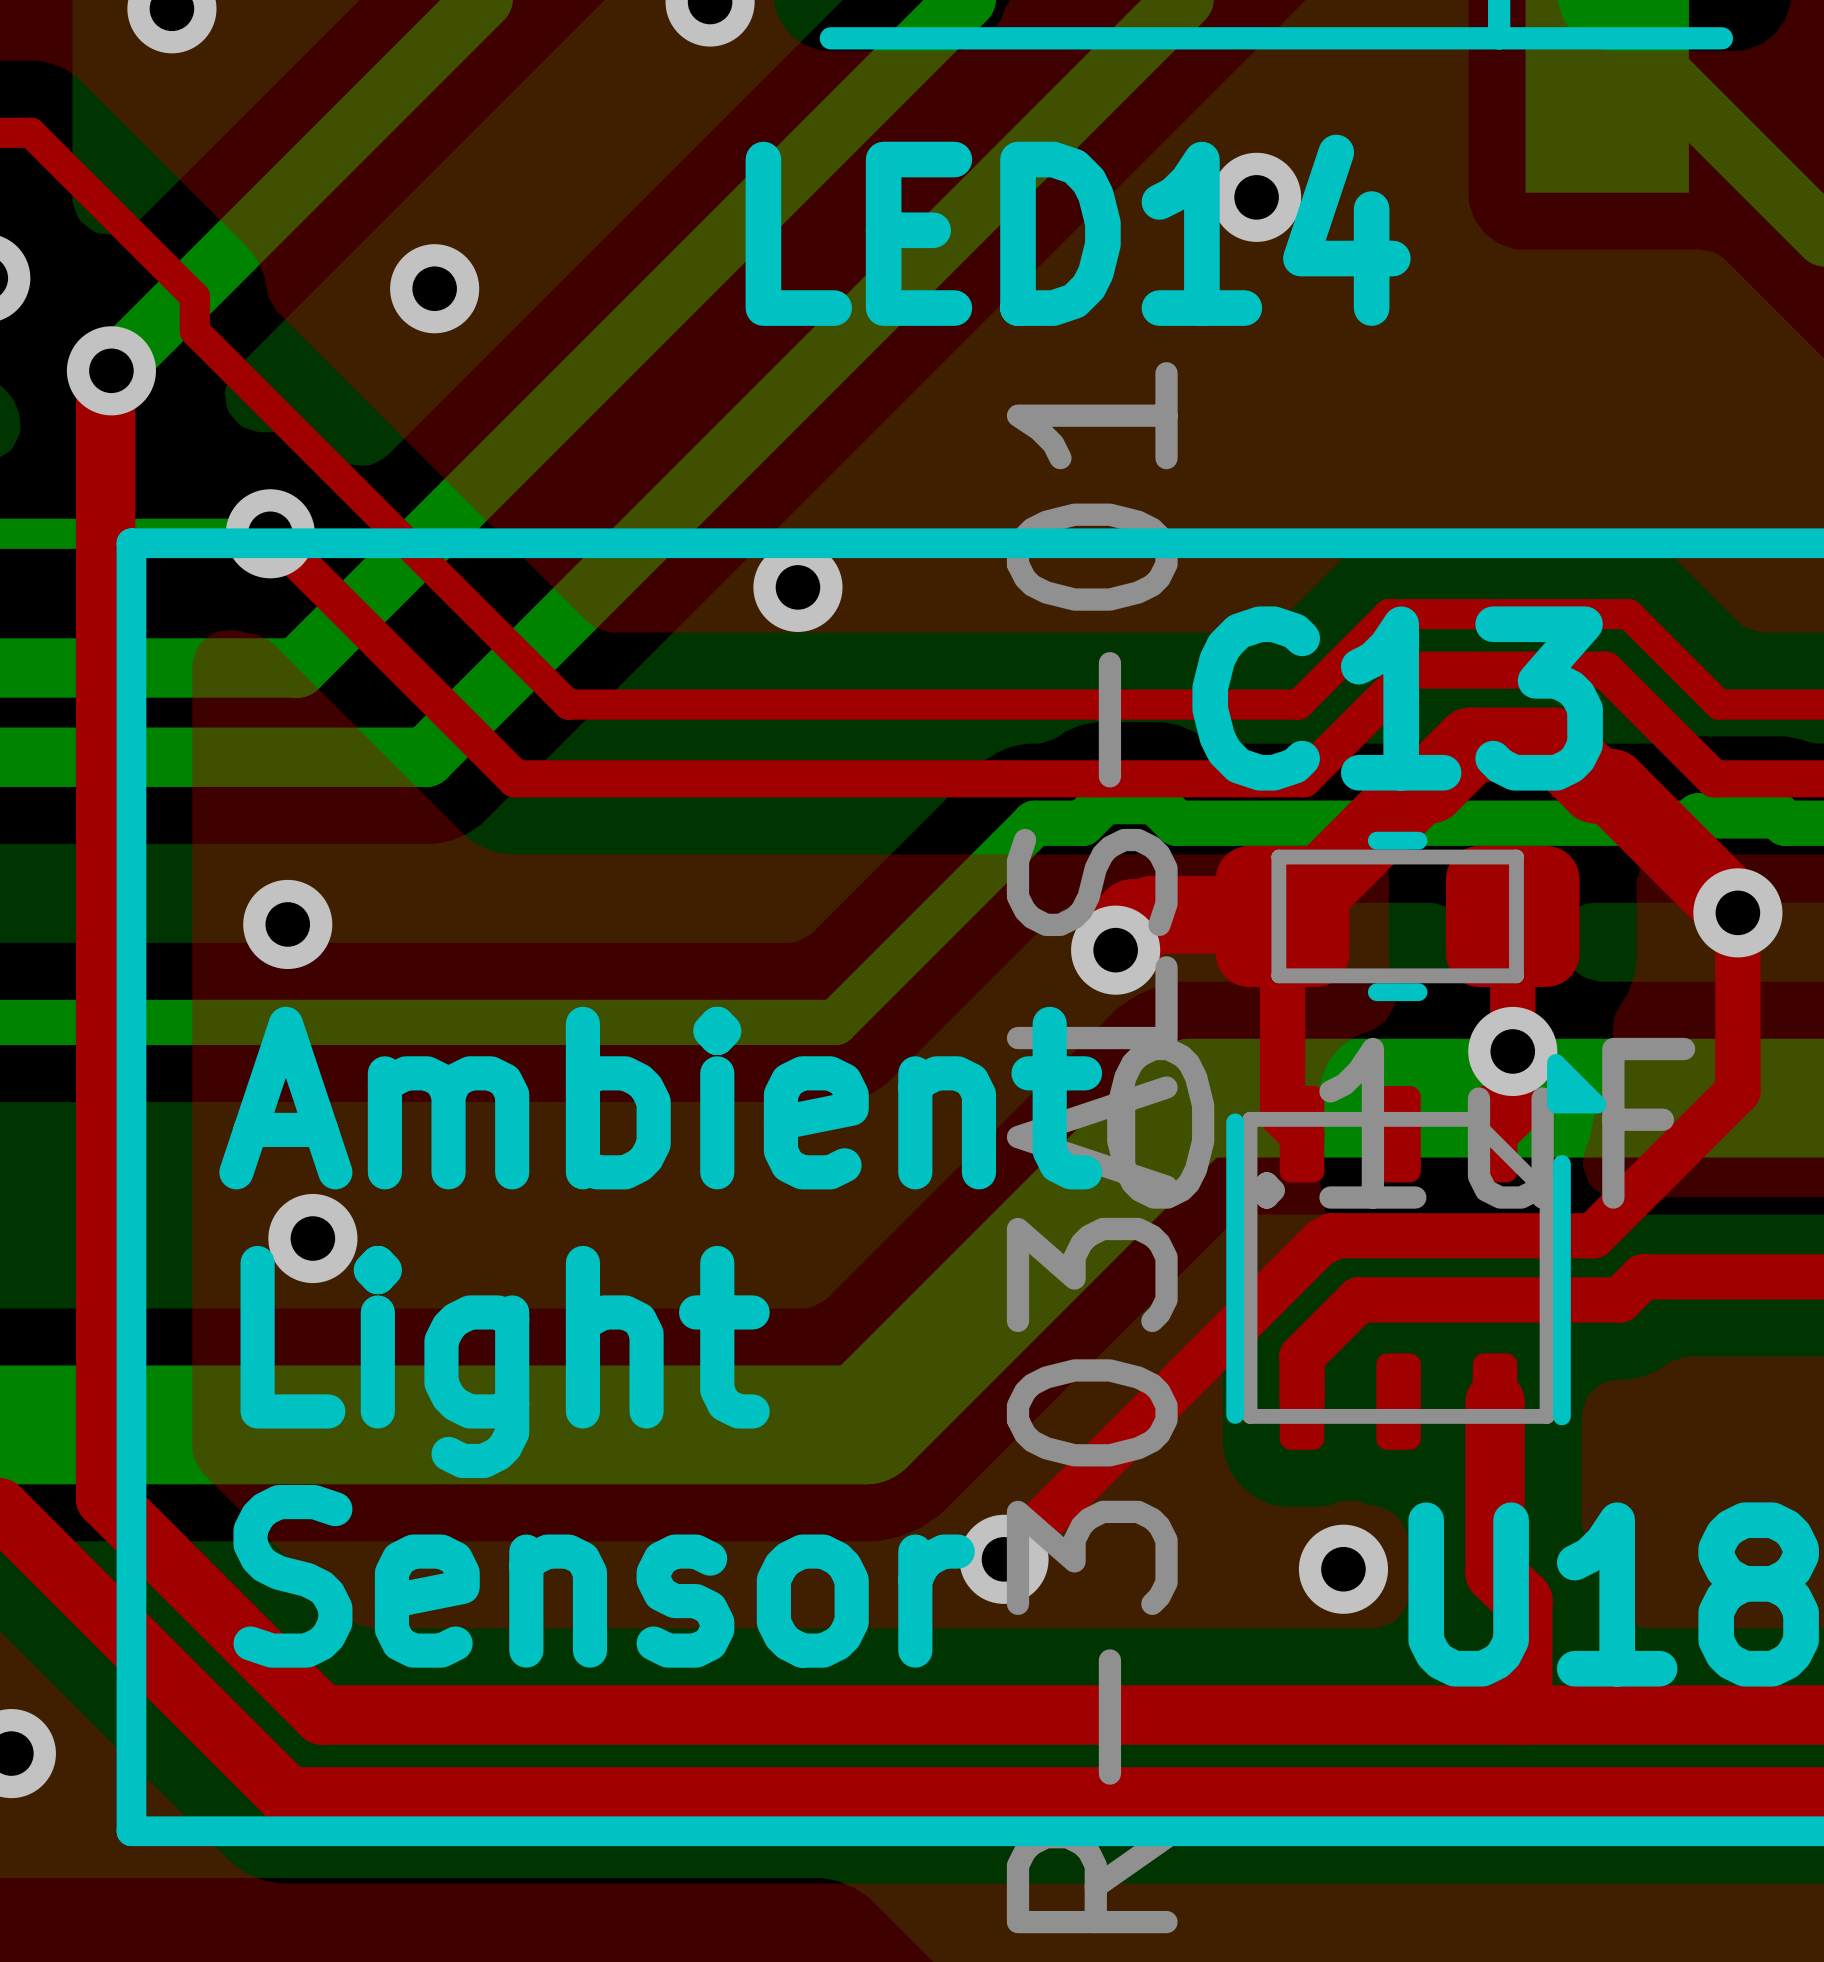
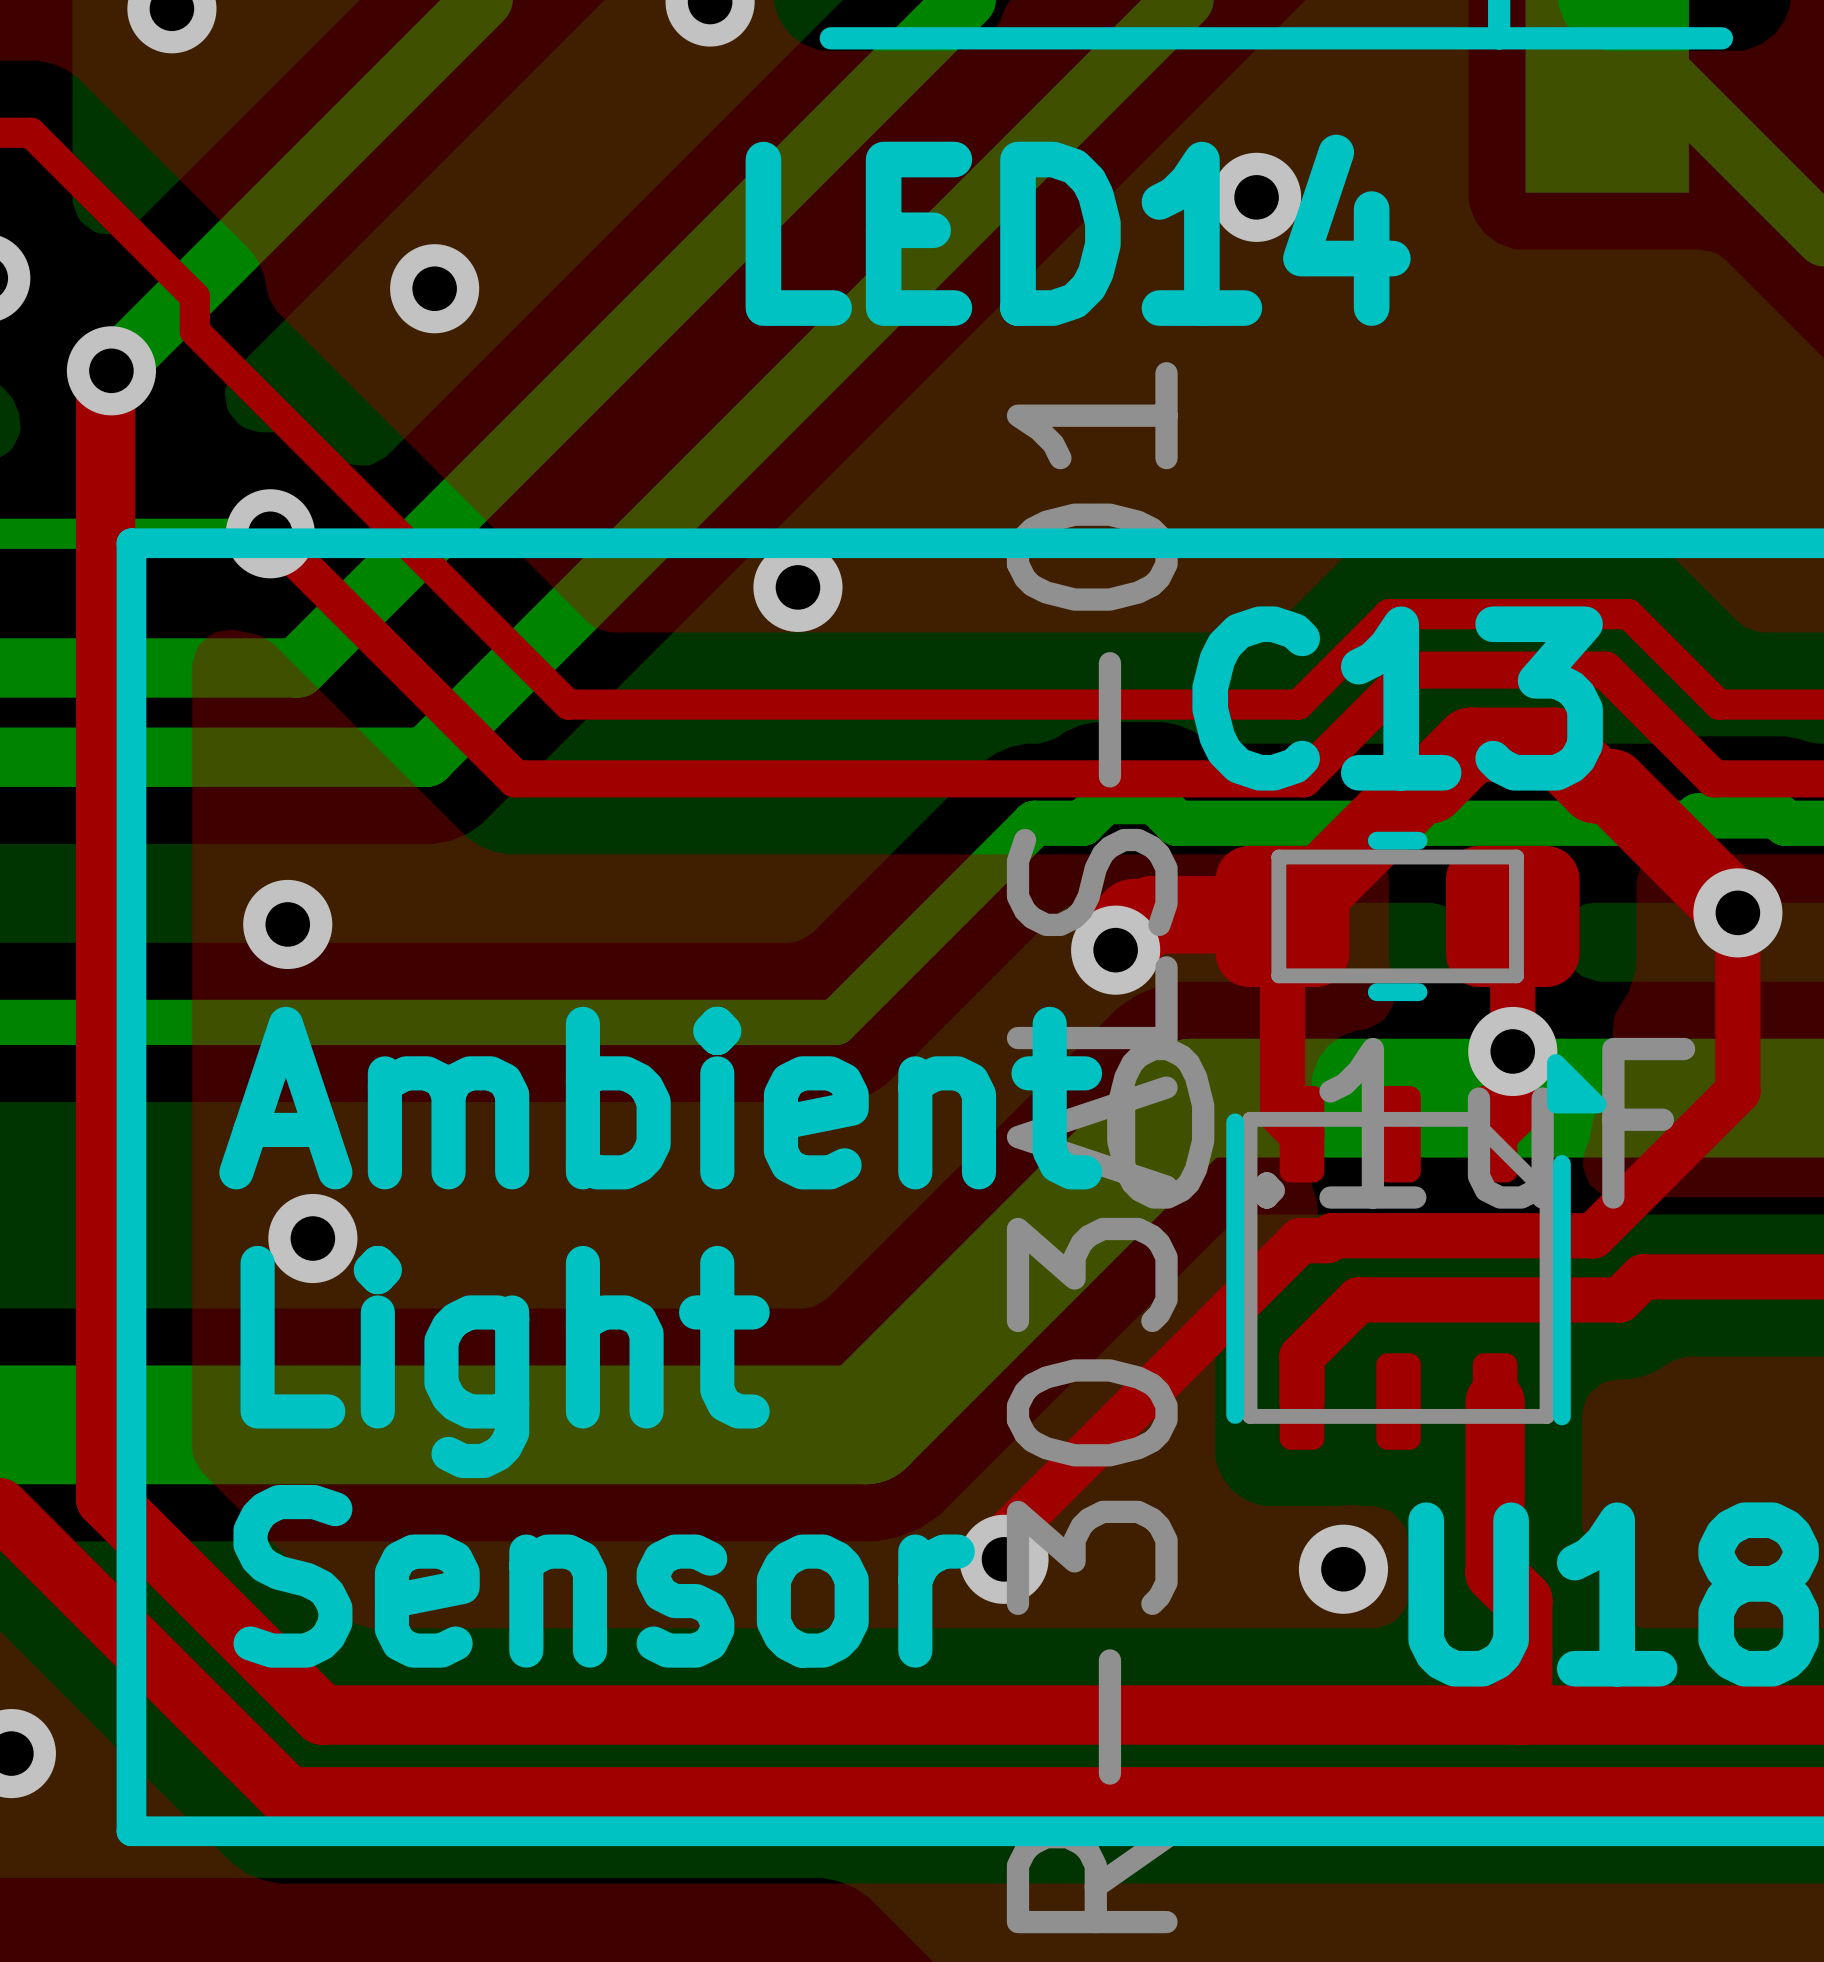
top track: (1322, 1240) (1004, 1559) -> (1322, 1240) (1300, 1240) (1004, 1537) (1004, 1559)

